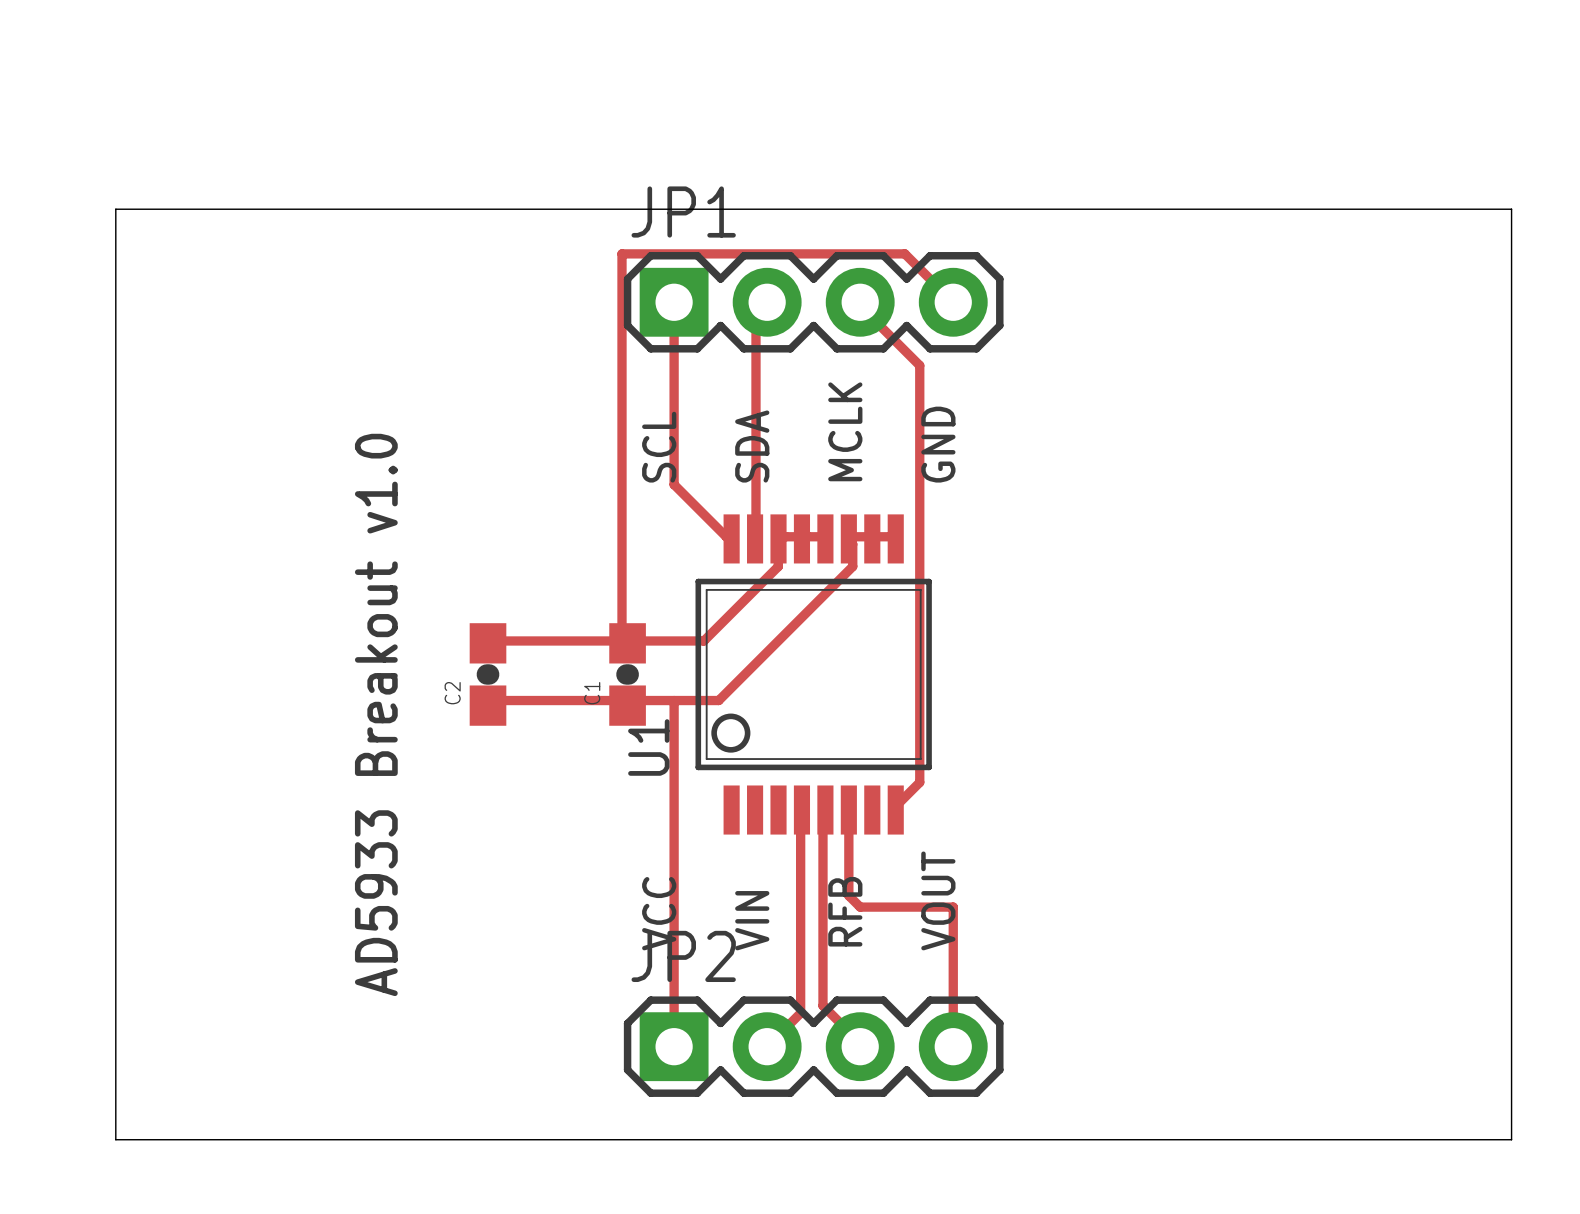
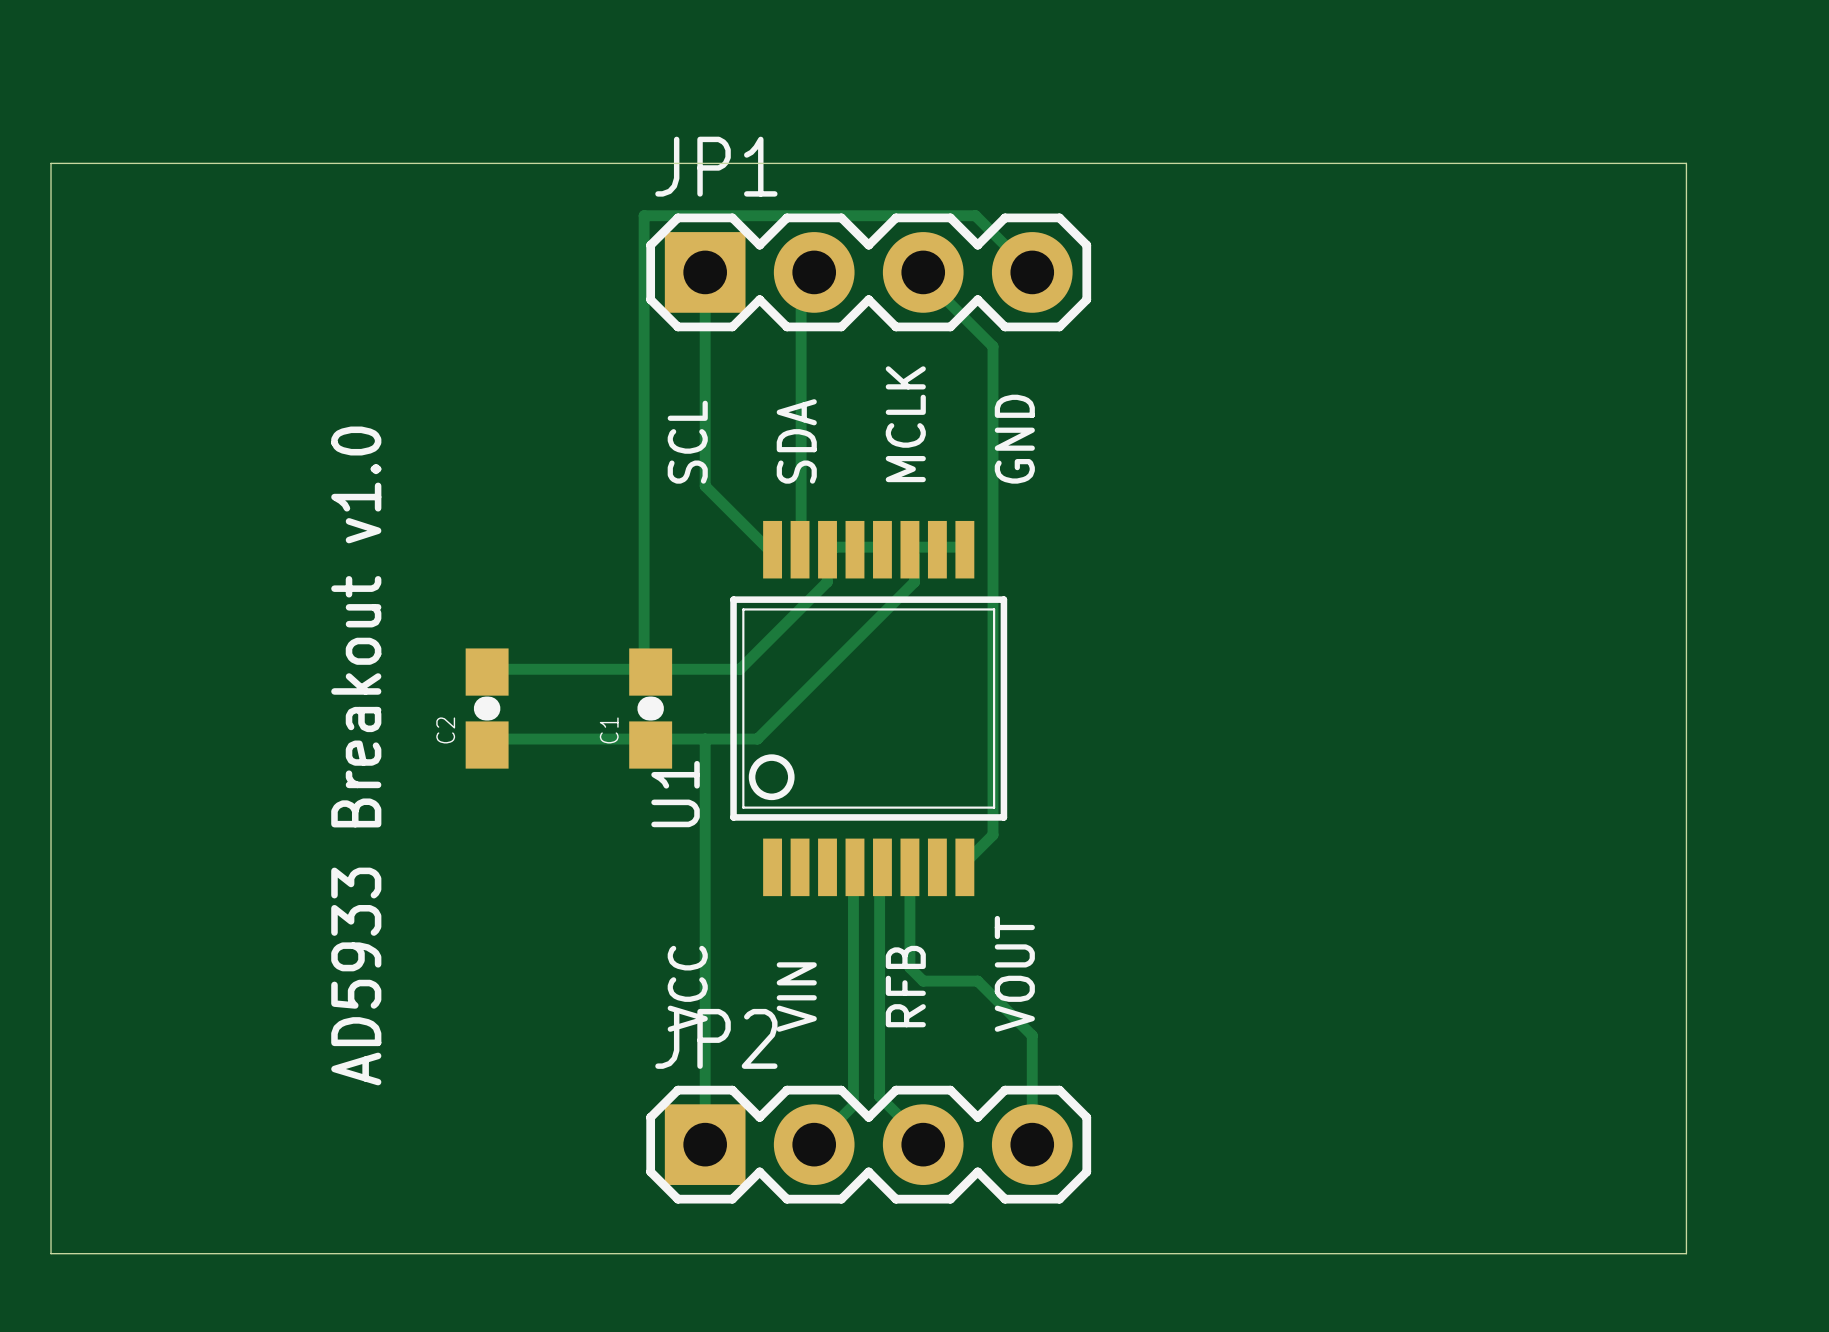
track: (906, 907) (953, 907) (953, 953) -> (977, 981) (1032, 1035)

